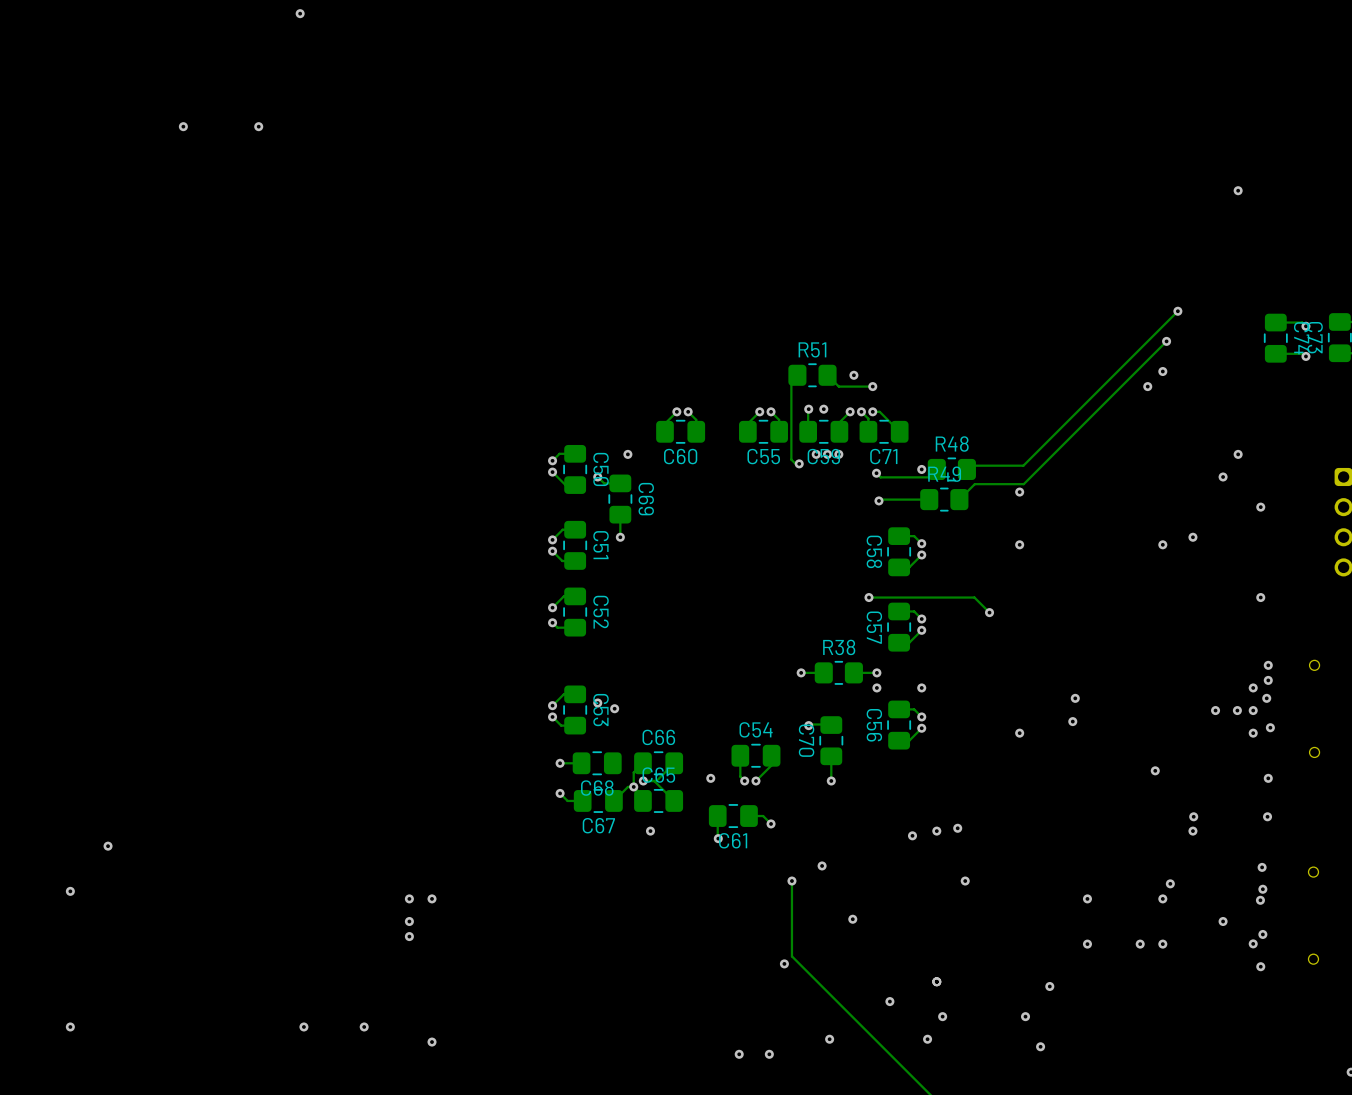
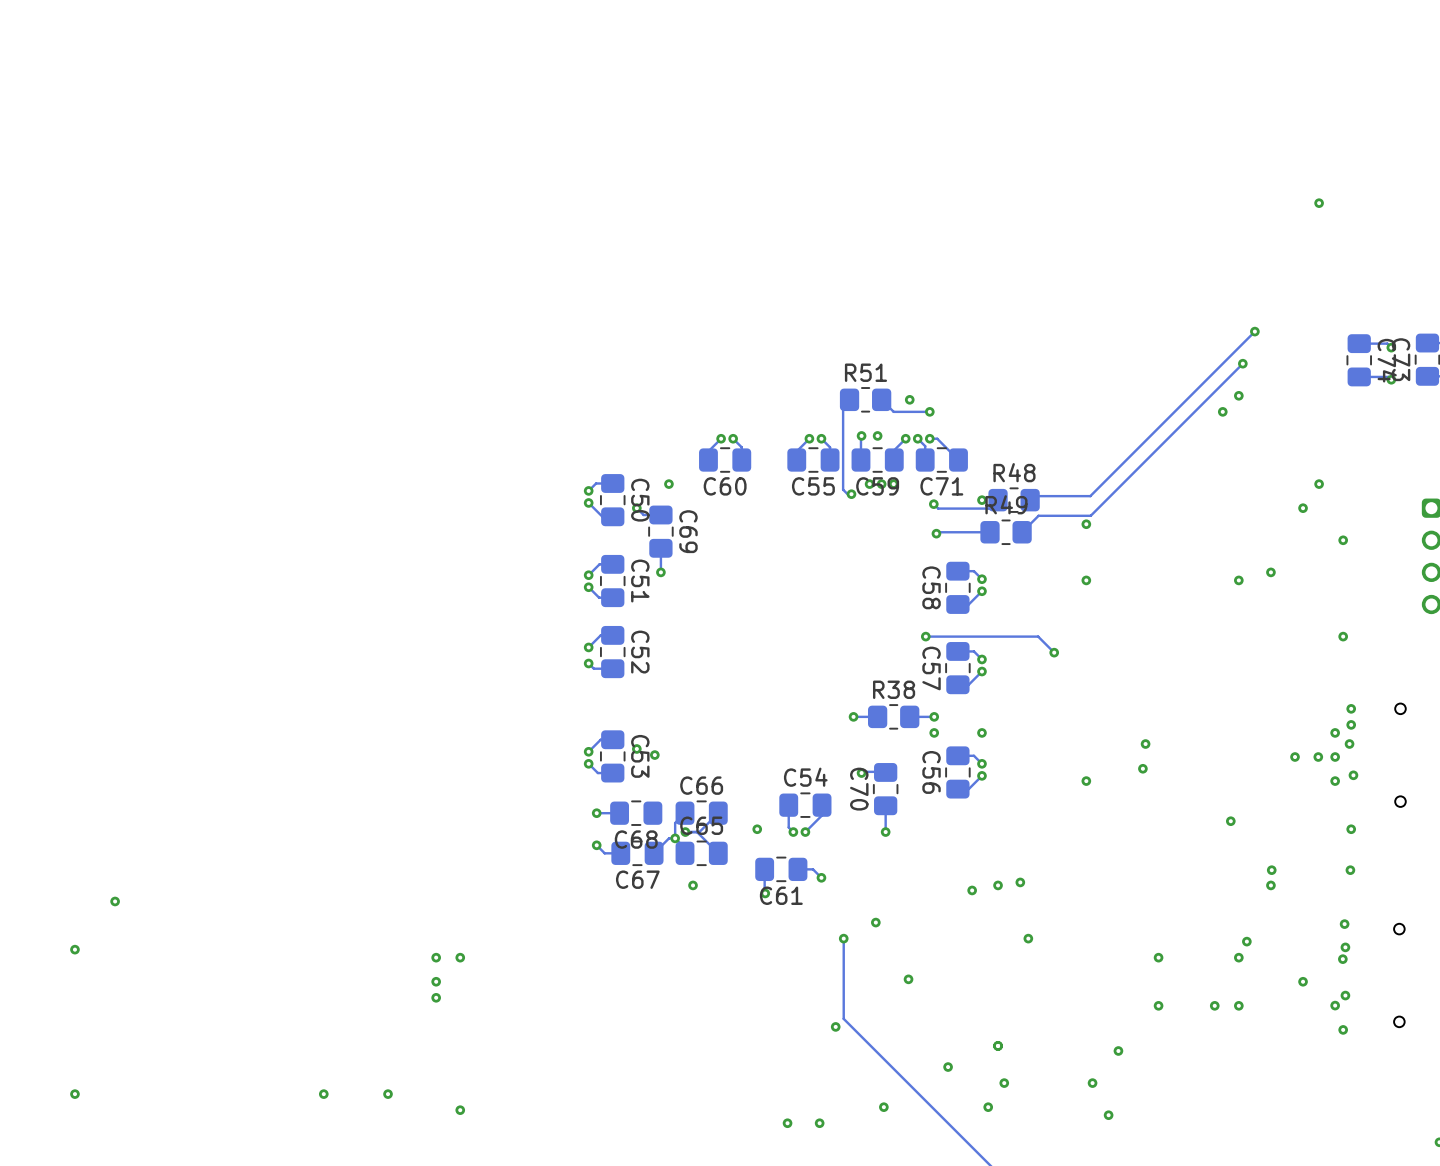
via: (300, 13) -> none
via: (183, 126) -> none
via: (258, 126) -> none

